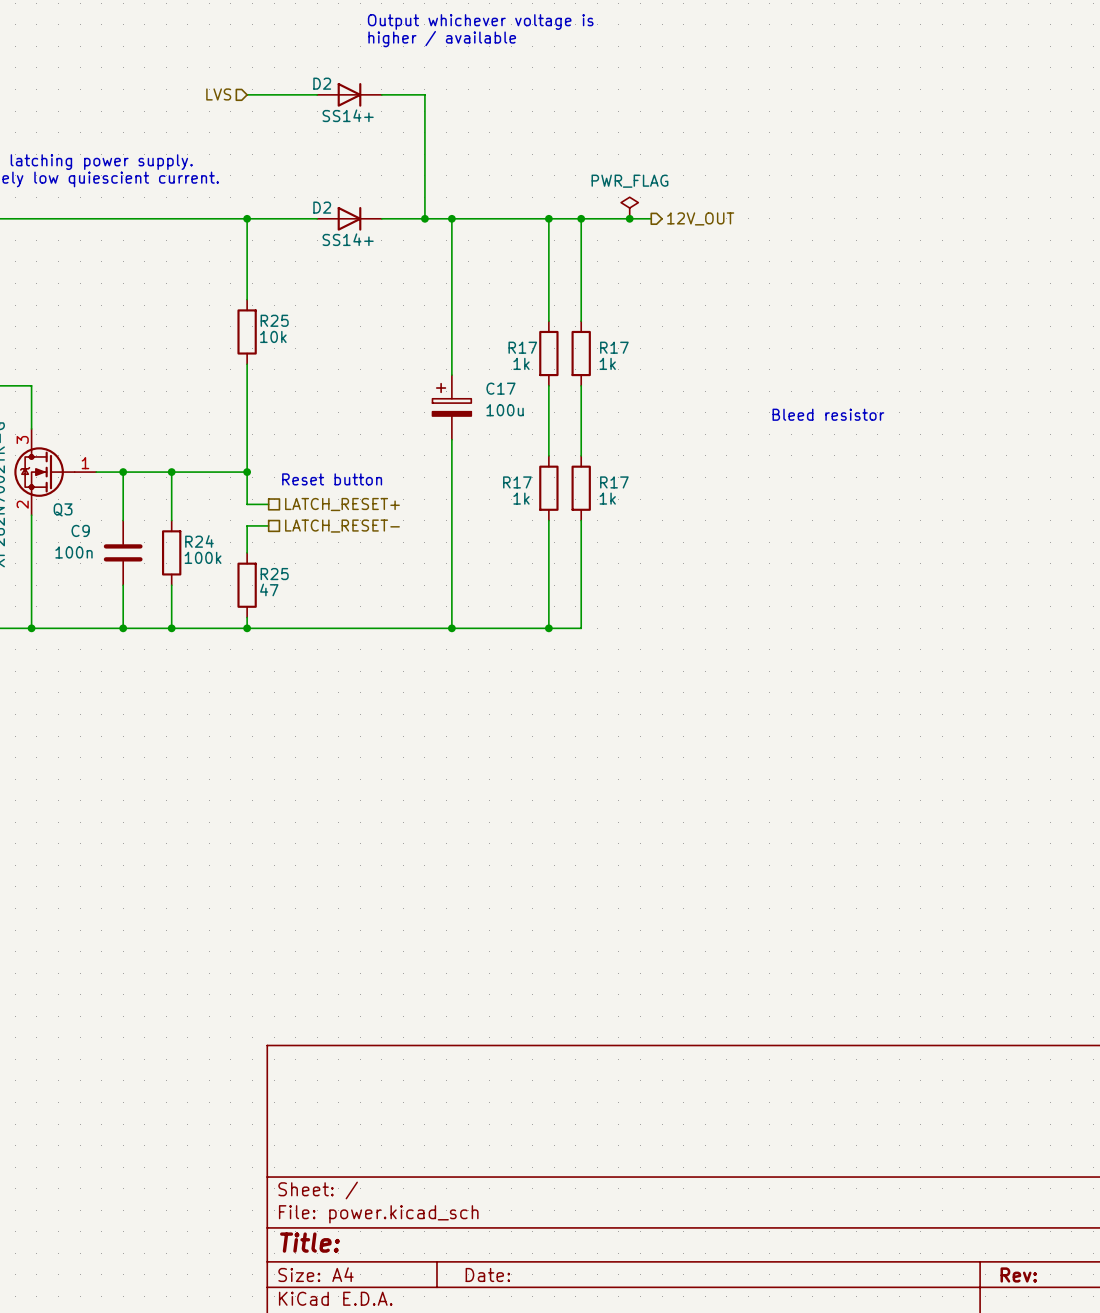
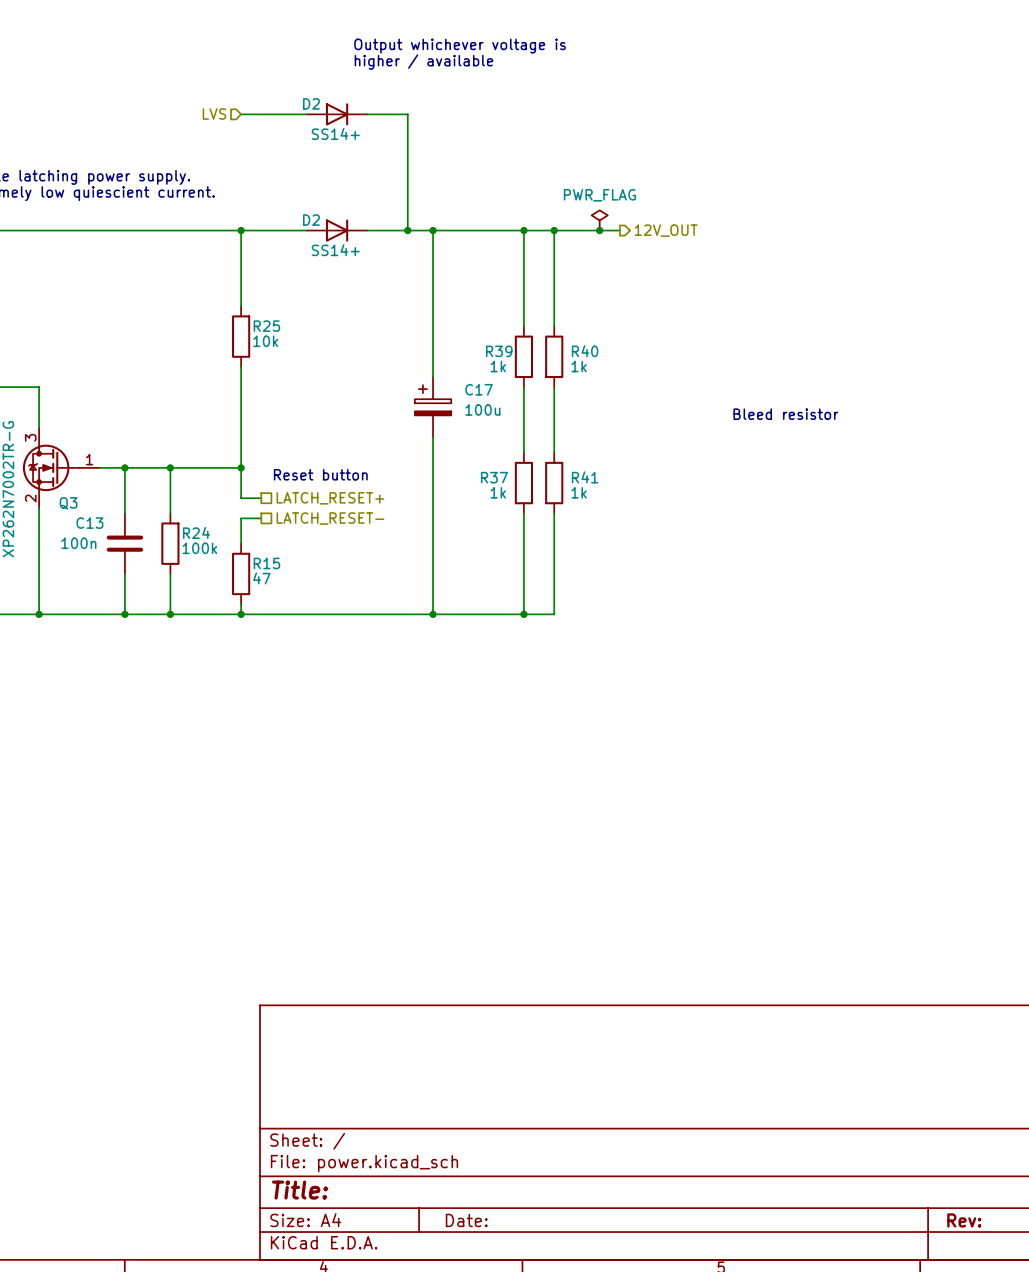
R17 name: R17 (522, 347) -> R39 (499, 351)
R17 name: R17 (614, 347) -> R40 (585, 351)
R17 name: R17 (517, 482) -> R37 (494, 477)
R17 name: R17 (614, 482) -> R41 (585, 477)
C9 name: C9 (80, 530) -> C13 (89, 523)
R25 name: R25 (274, 574) -> R15 (266, 563)

